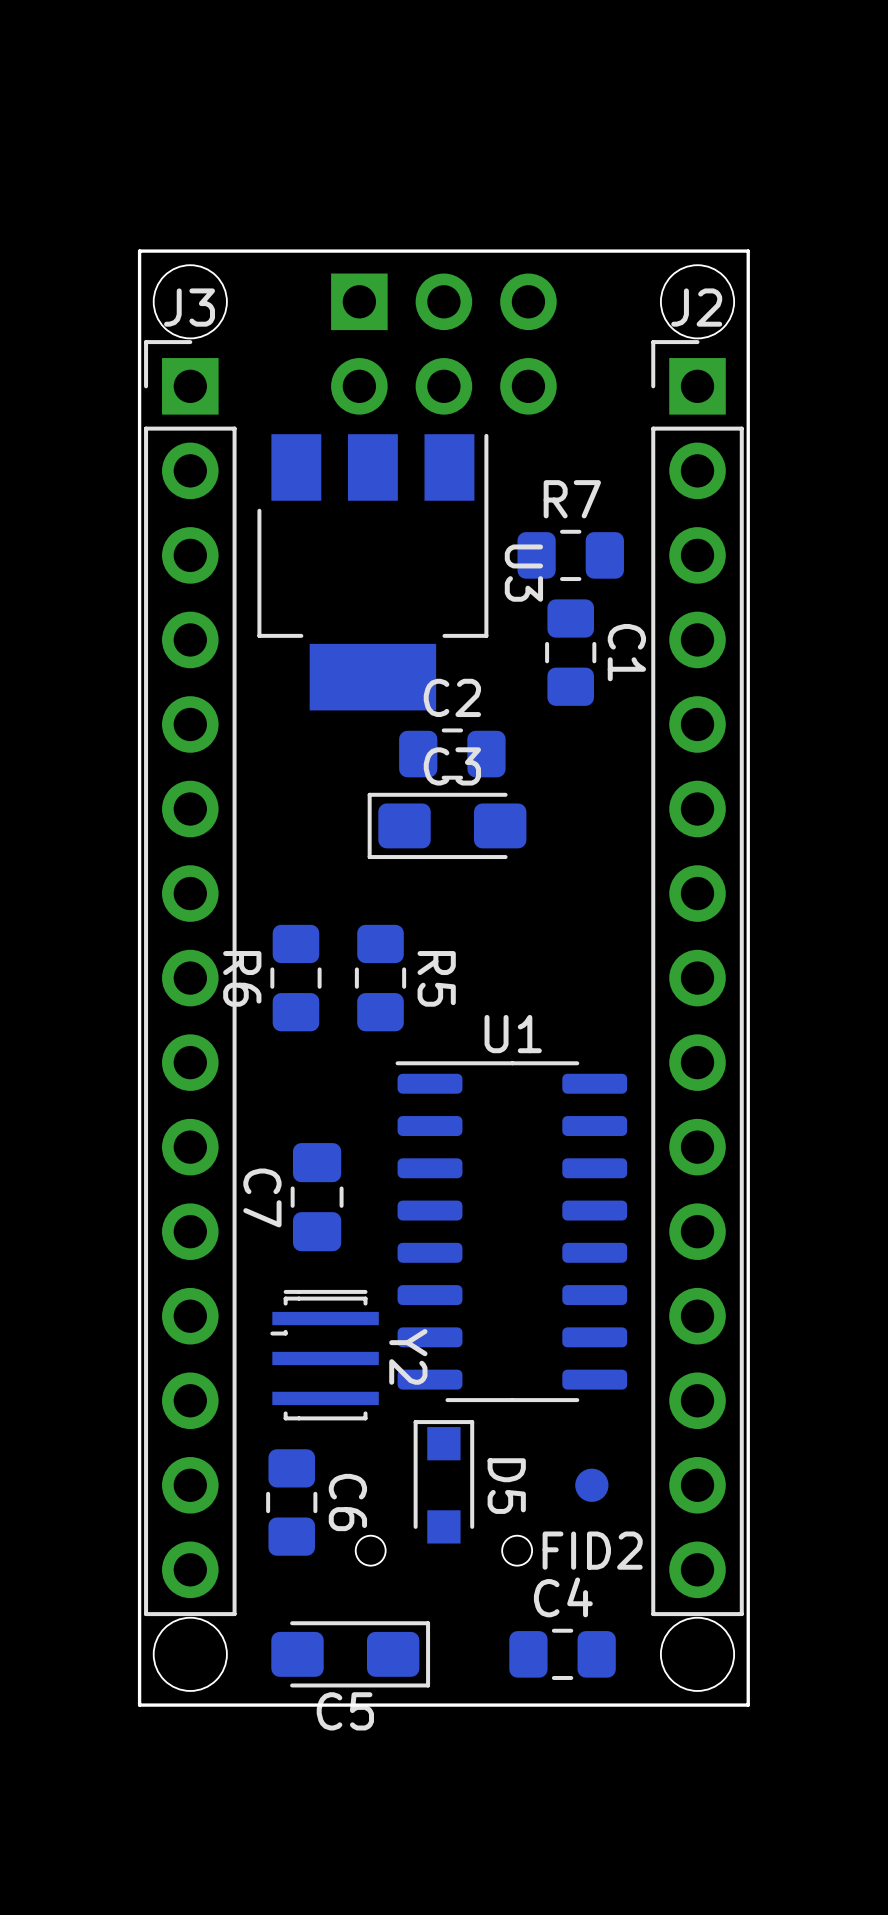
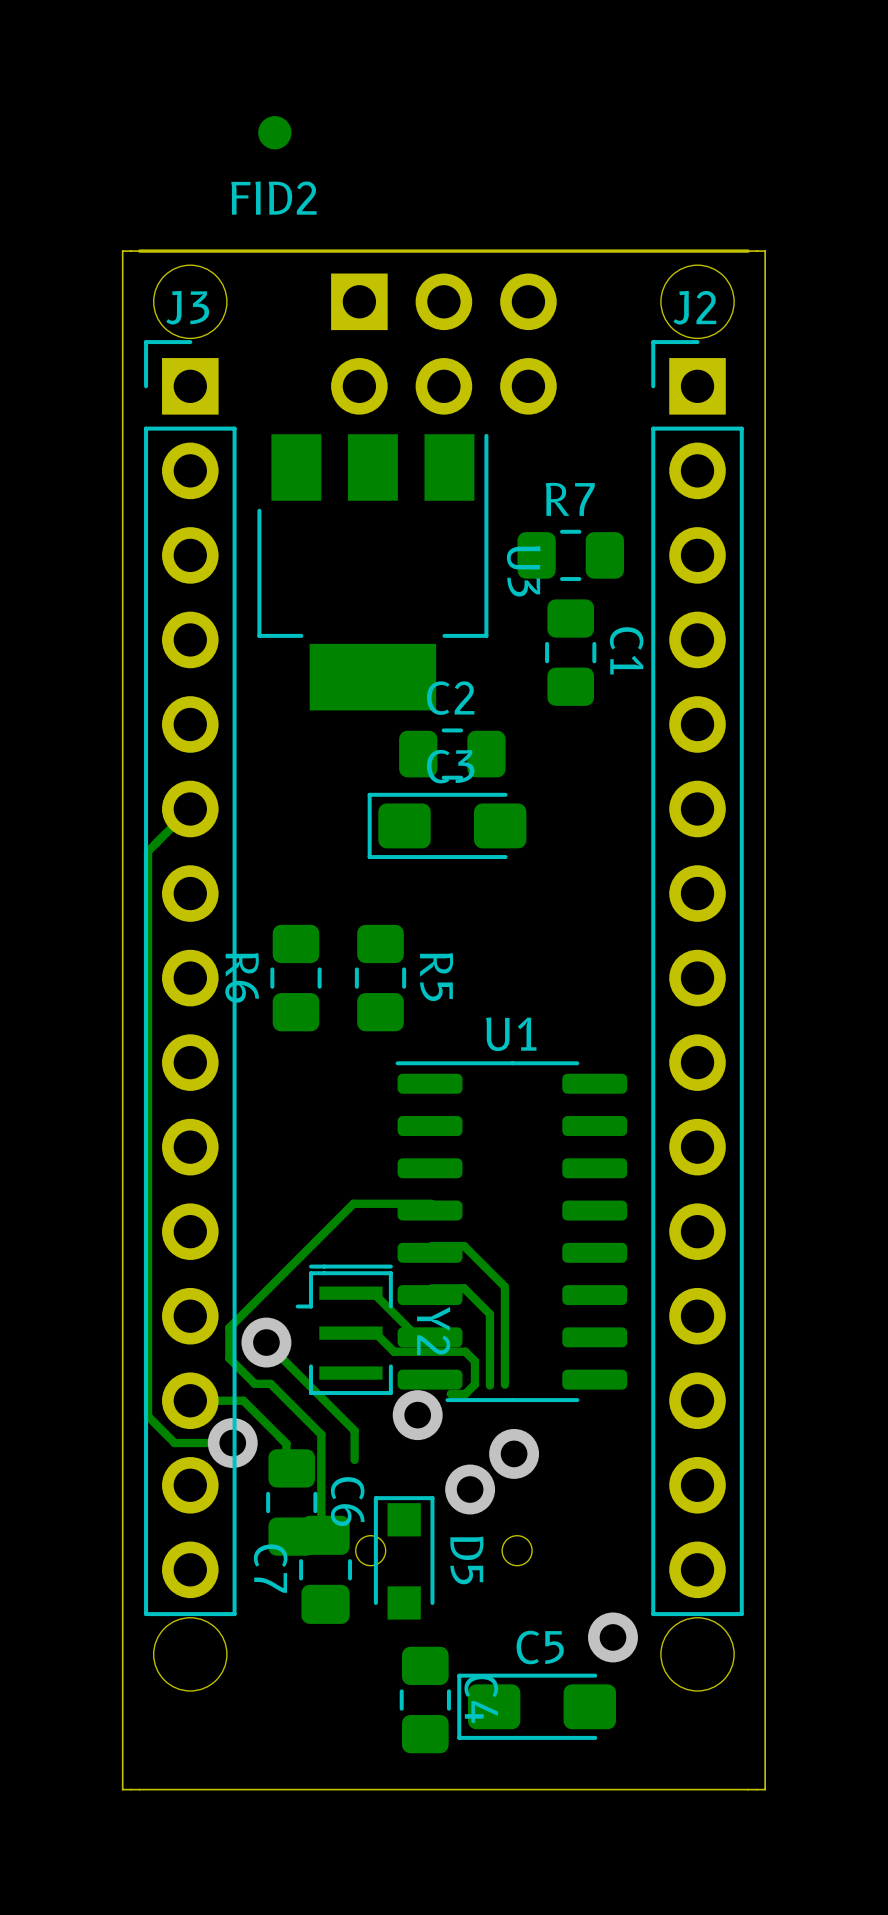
board edge: (748, 251) (748, 1705) (139, 1705) (139, 251) -> (748, 251) (765, 251) (765, 1789) (122, 1789) (122, 251) (139, 251)
track: none -> (190, 809) (148, 851) (148, 1416) (174, 1443) (232, 1443)
C7 position: (317, 1197) -> (325, 1569)
track: none -> (431, 1203) (353, 1203) (229, 1327) (229, 1358) (254, 1383) (270, 1383) (321, 1434) (321, 1531) (325, 1536)
track: none -> (431, 1246) (464, 1246) (504, 1286) (504, 1384)
track: none -> (431, 1288) (464, 1288) (489, 1314) (489, 1385)
Y2 footprint: [270, 1289, 379, 1421] -> [295, 1264, 393, 1396]
track: none -> (350, 1293) (373, 1293) (410, 1330)
track: none -> (350, 1333) (375, 1333) (394, 1351) (465, 1351) (474, 1361) (474, 1384) (465, 1393) (450, 1393)
track: none -> (266, 1342) (354, 1430) (354, 1459)
via: none -> (266, 1342)
track: none -> (190, 1400) (243, 1400) (286, 1443) (286, 1459)
via: none -> (417, 1415)
via: none -> (232, 1443)
via: none -> (514, 1453)
D5 position: (443, 1481) -> (404, 1557)
FID2 position: (591, 1485) -> (274, 132)
via: none -> (470, 1489)
via: none -> (612, 1637)
C5 rotation: 0° (350, 1654) -> 180° (536, 1706)
C5 position: (350, 1654) -> (536, 1706)
C4 rotation: 0° (562, 1654) -> 90° clockwise (425, 1700)
C4 position: (562, 1654) -> (425, 1700)

